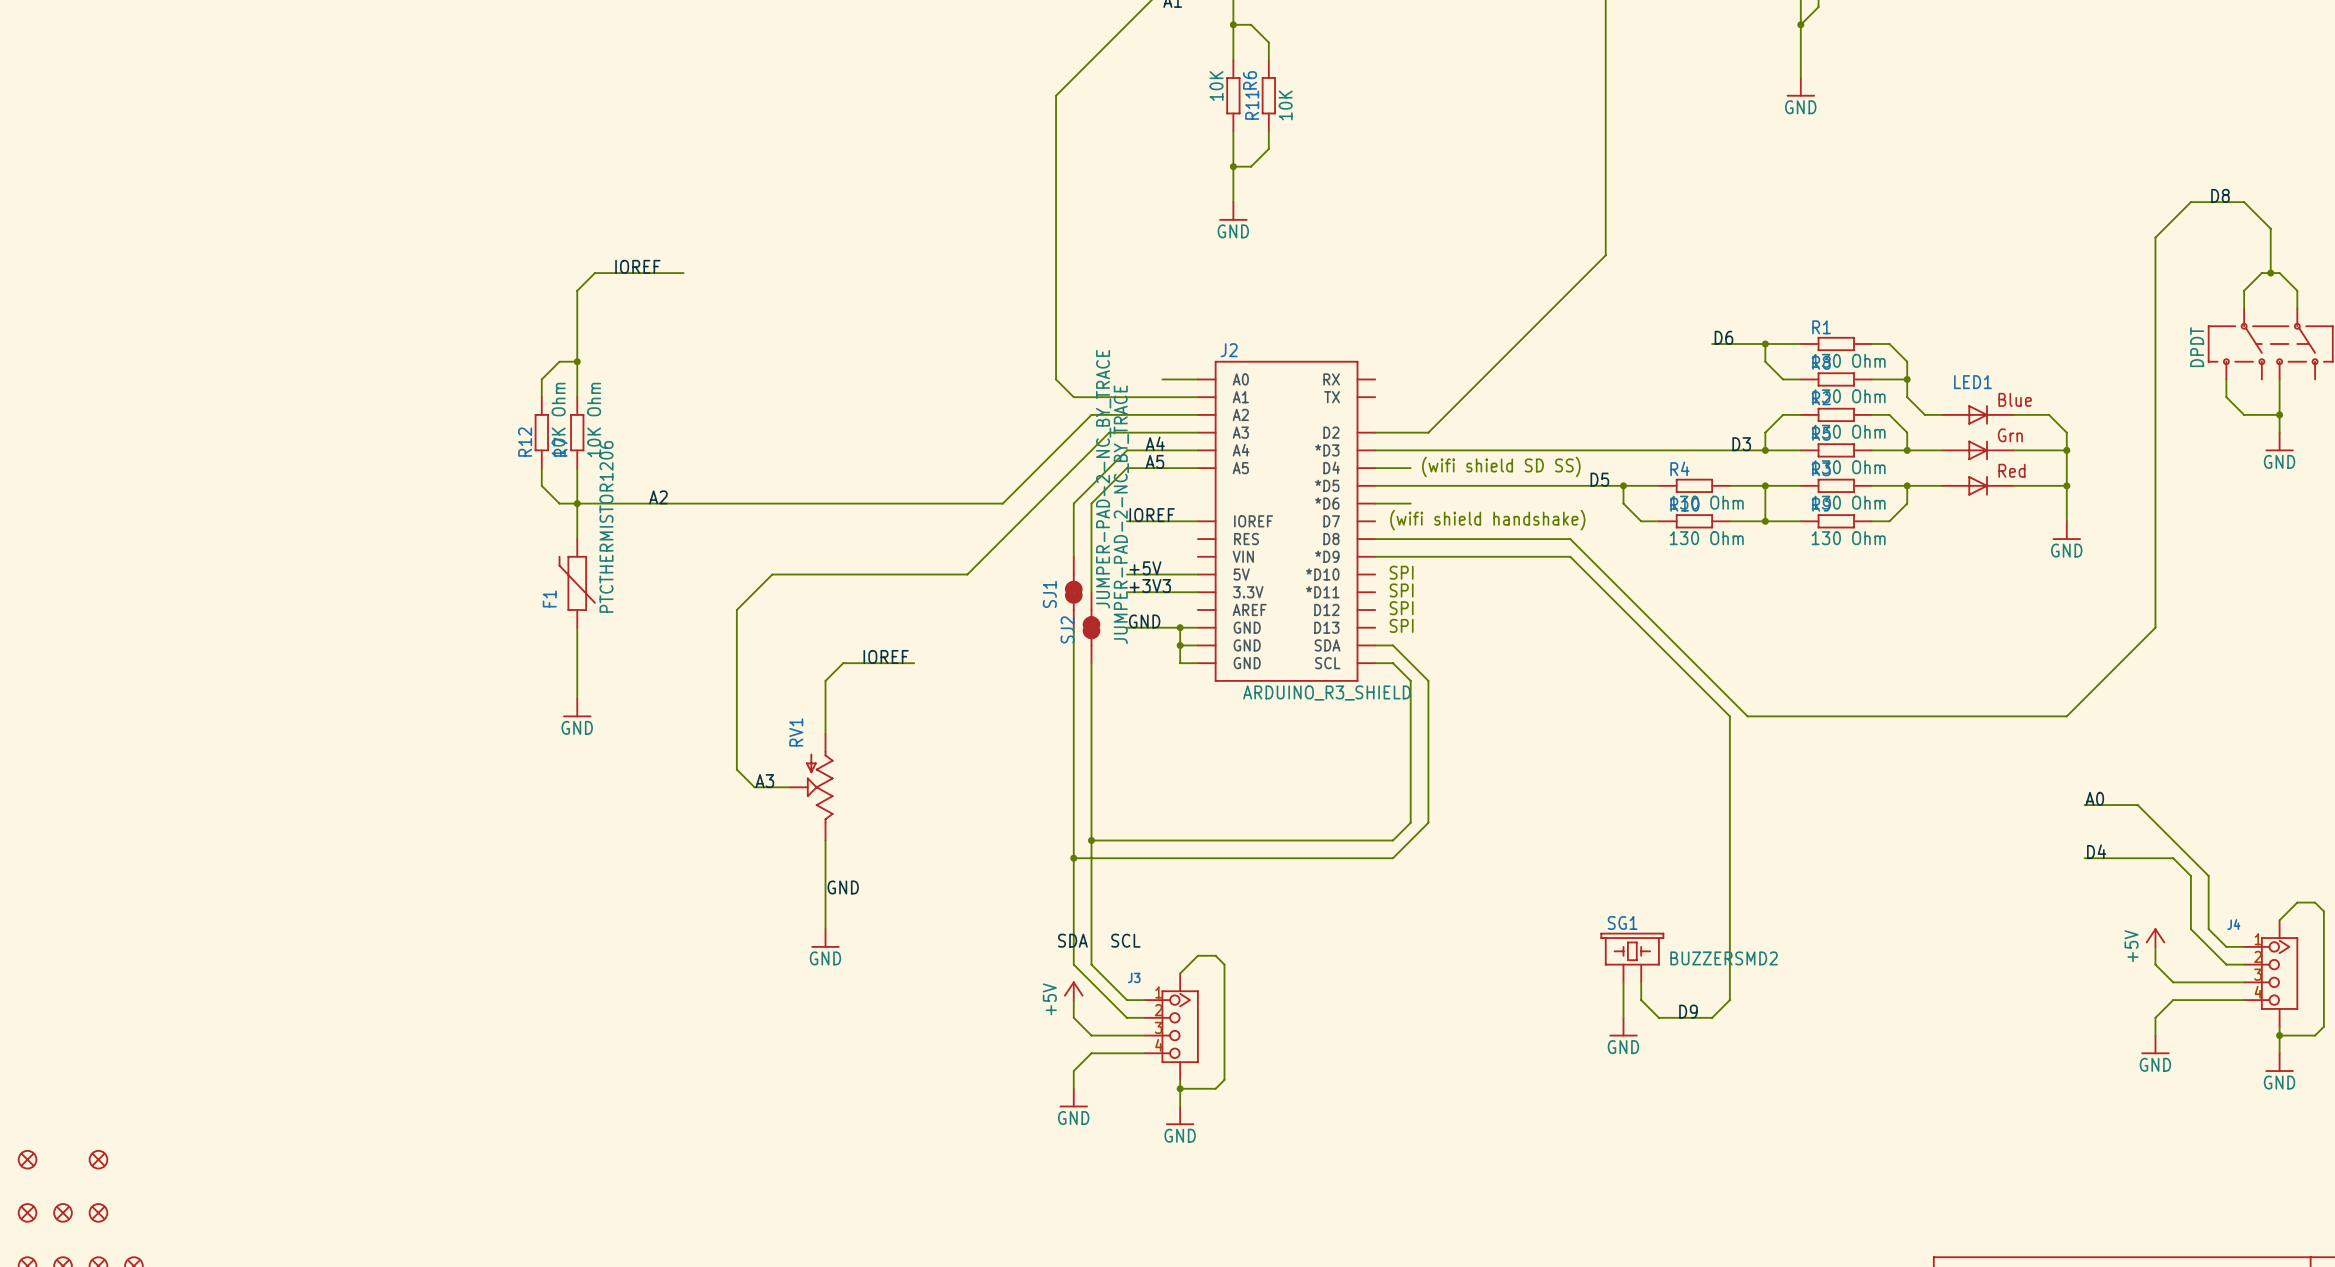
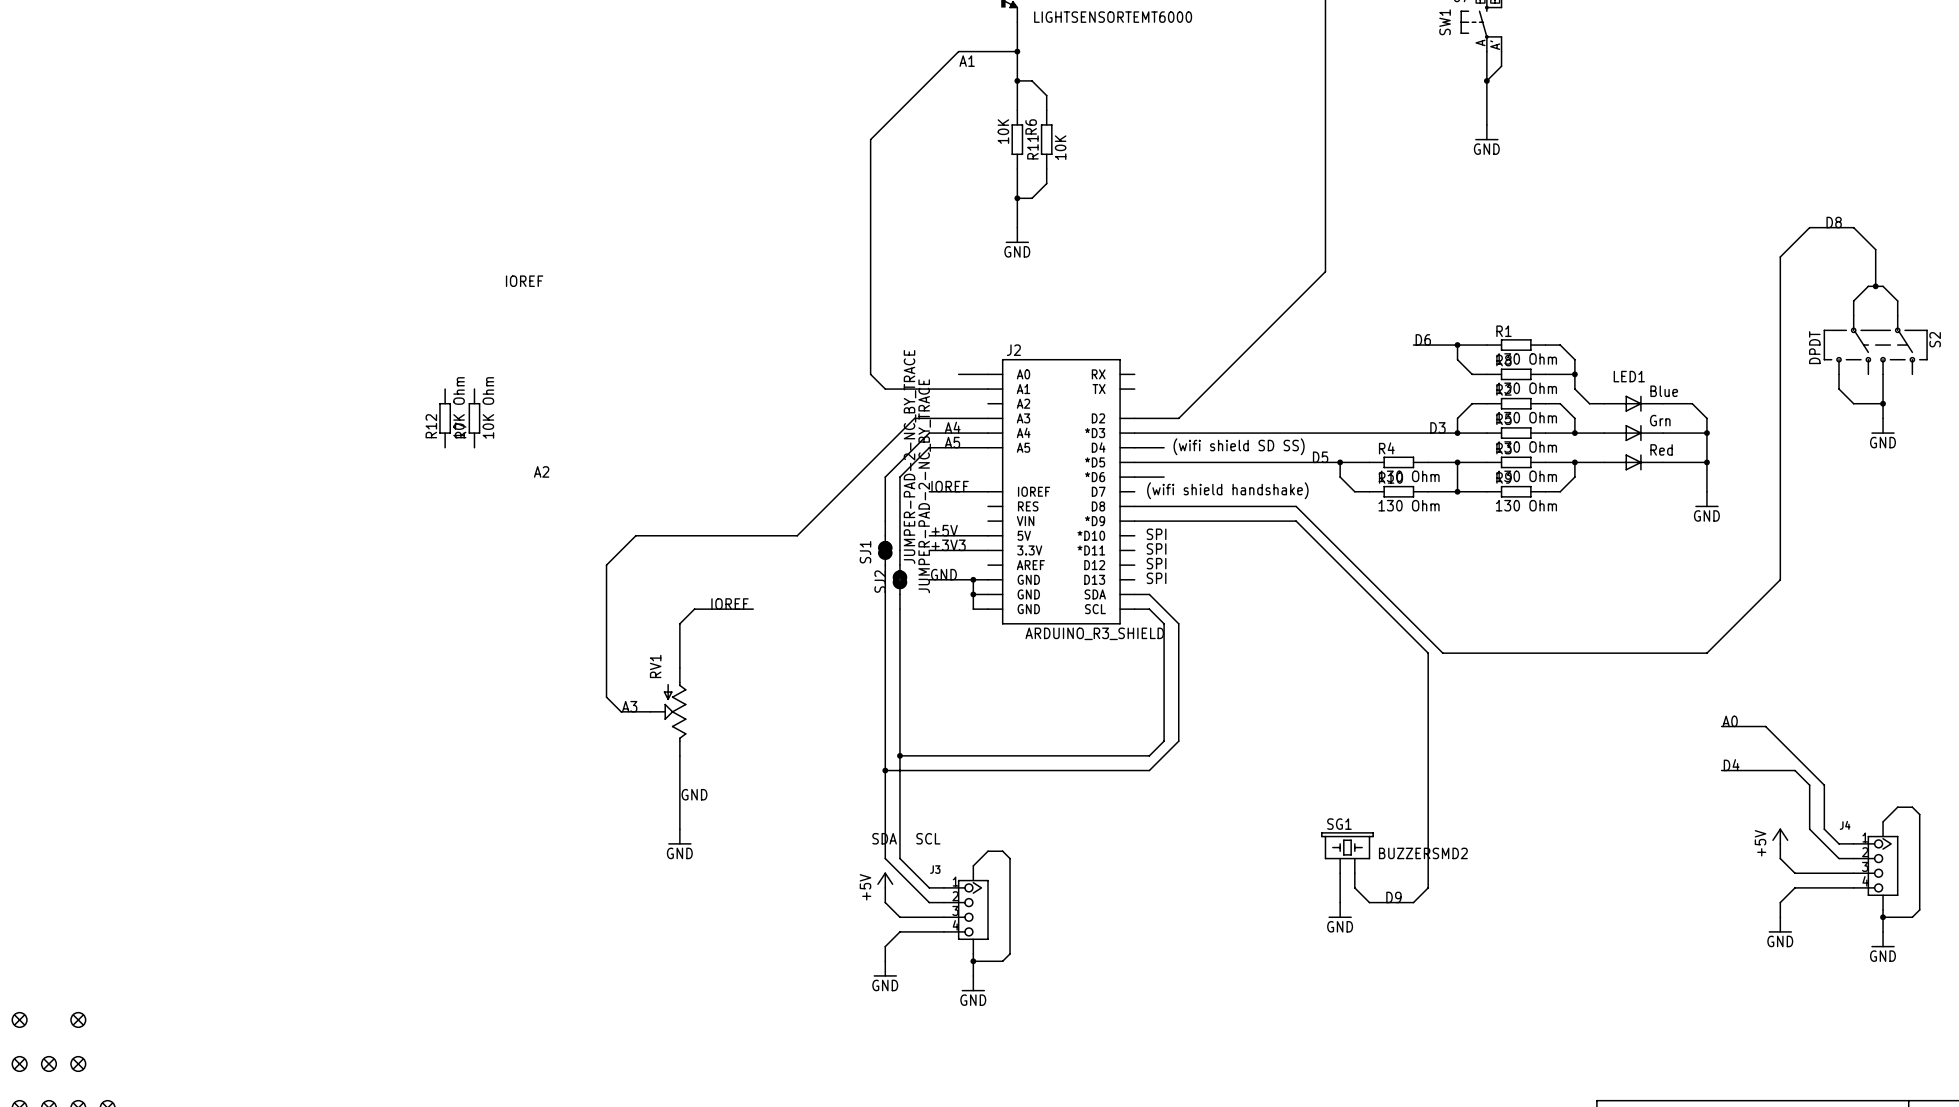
wire: (683, 273) (594, 273) (577, 290) (577, 397) -> none
wire: (577, 361) (559, 361) (541, 379) (541, 397) -> none
junction: (577, 361) -> none
wire: (1197, 414) (1091, 414) (1002, 503) (559, 503) (541, 485) (541, 468) -> none
wire: (577, 468) (577, 539) -> none
junction: (577, 503) -> none
F1: PTCTHERMISTOR1206 (577, 583) -> none
wire: (577, 627) (577, 698) -> none
power symbol: GND (577, 707) -> none

